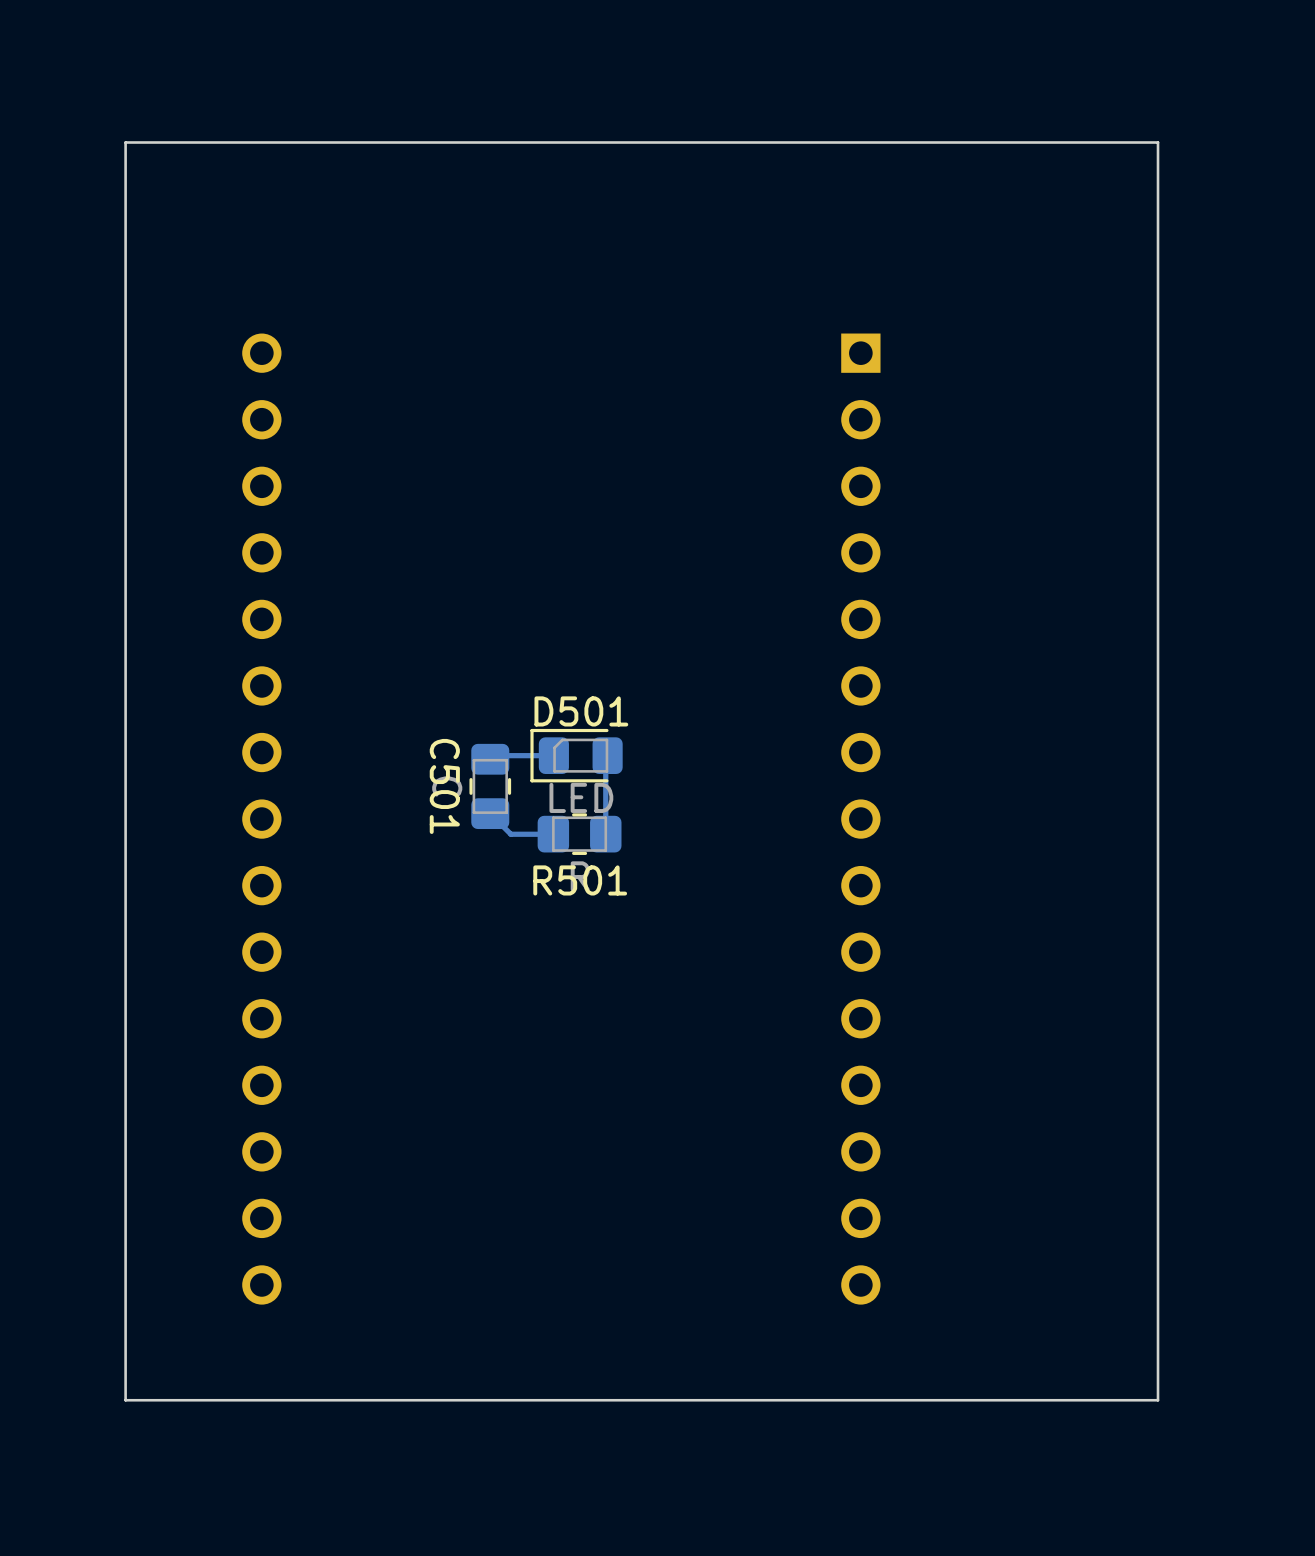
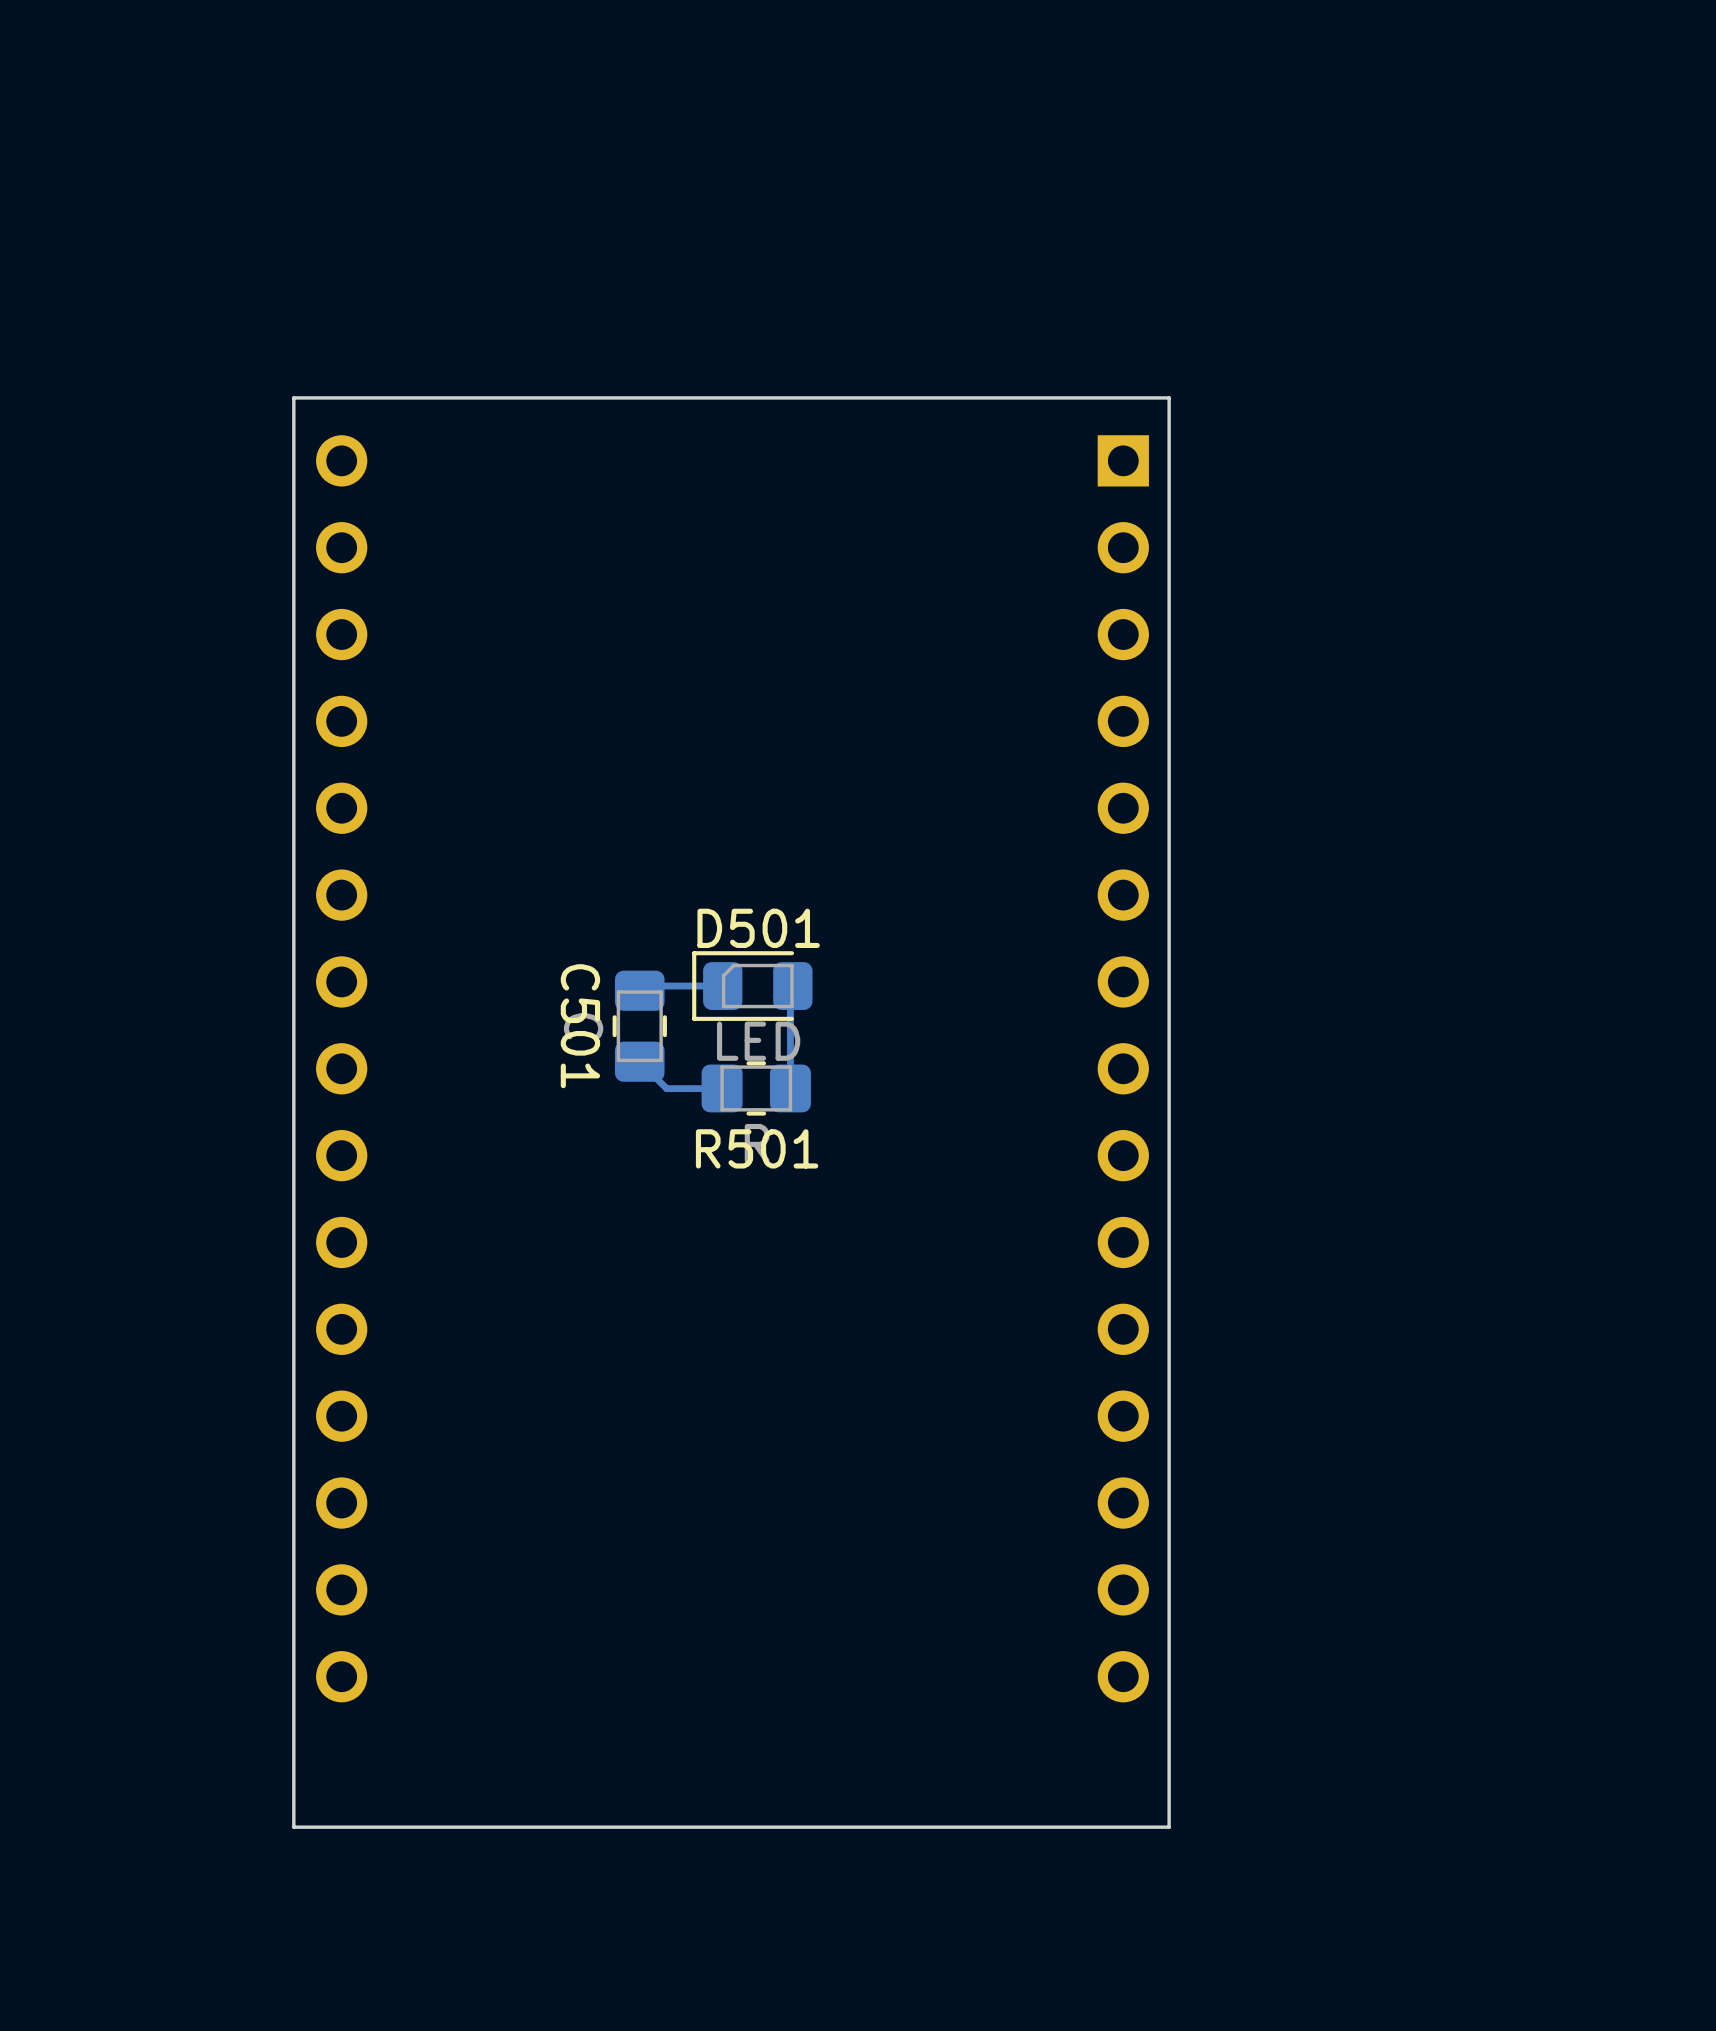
board edge: (895, 1400) (1158, 1400) (1158, 142) (125, 142) (125, 1400) (225, 1400) -> (1169, 1827) (1169, 397) (293, 397) (293, 1827)

